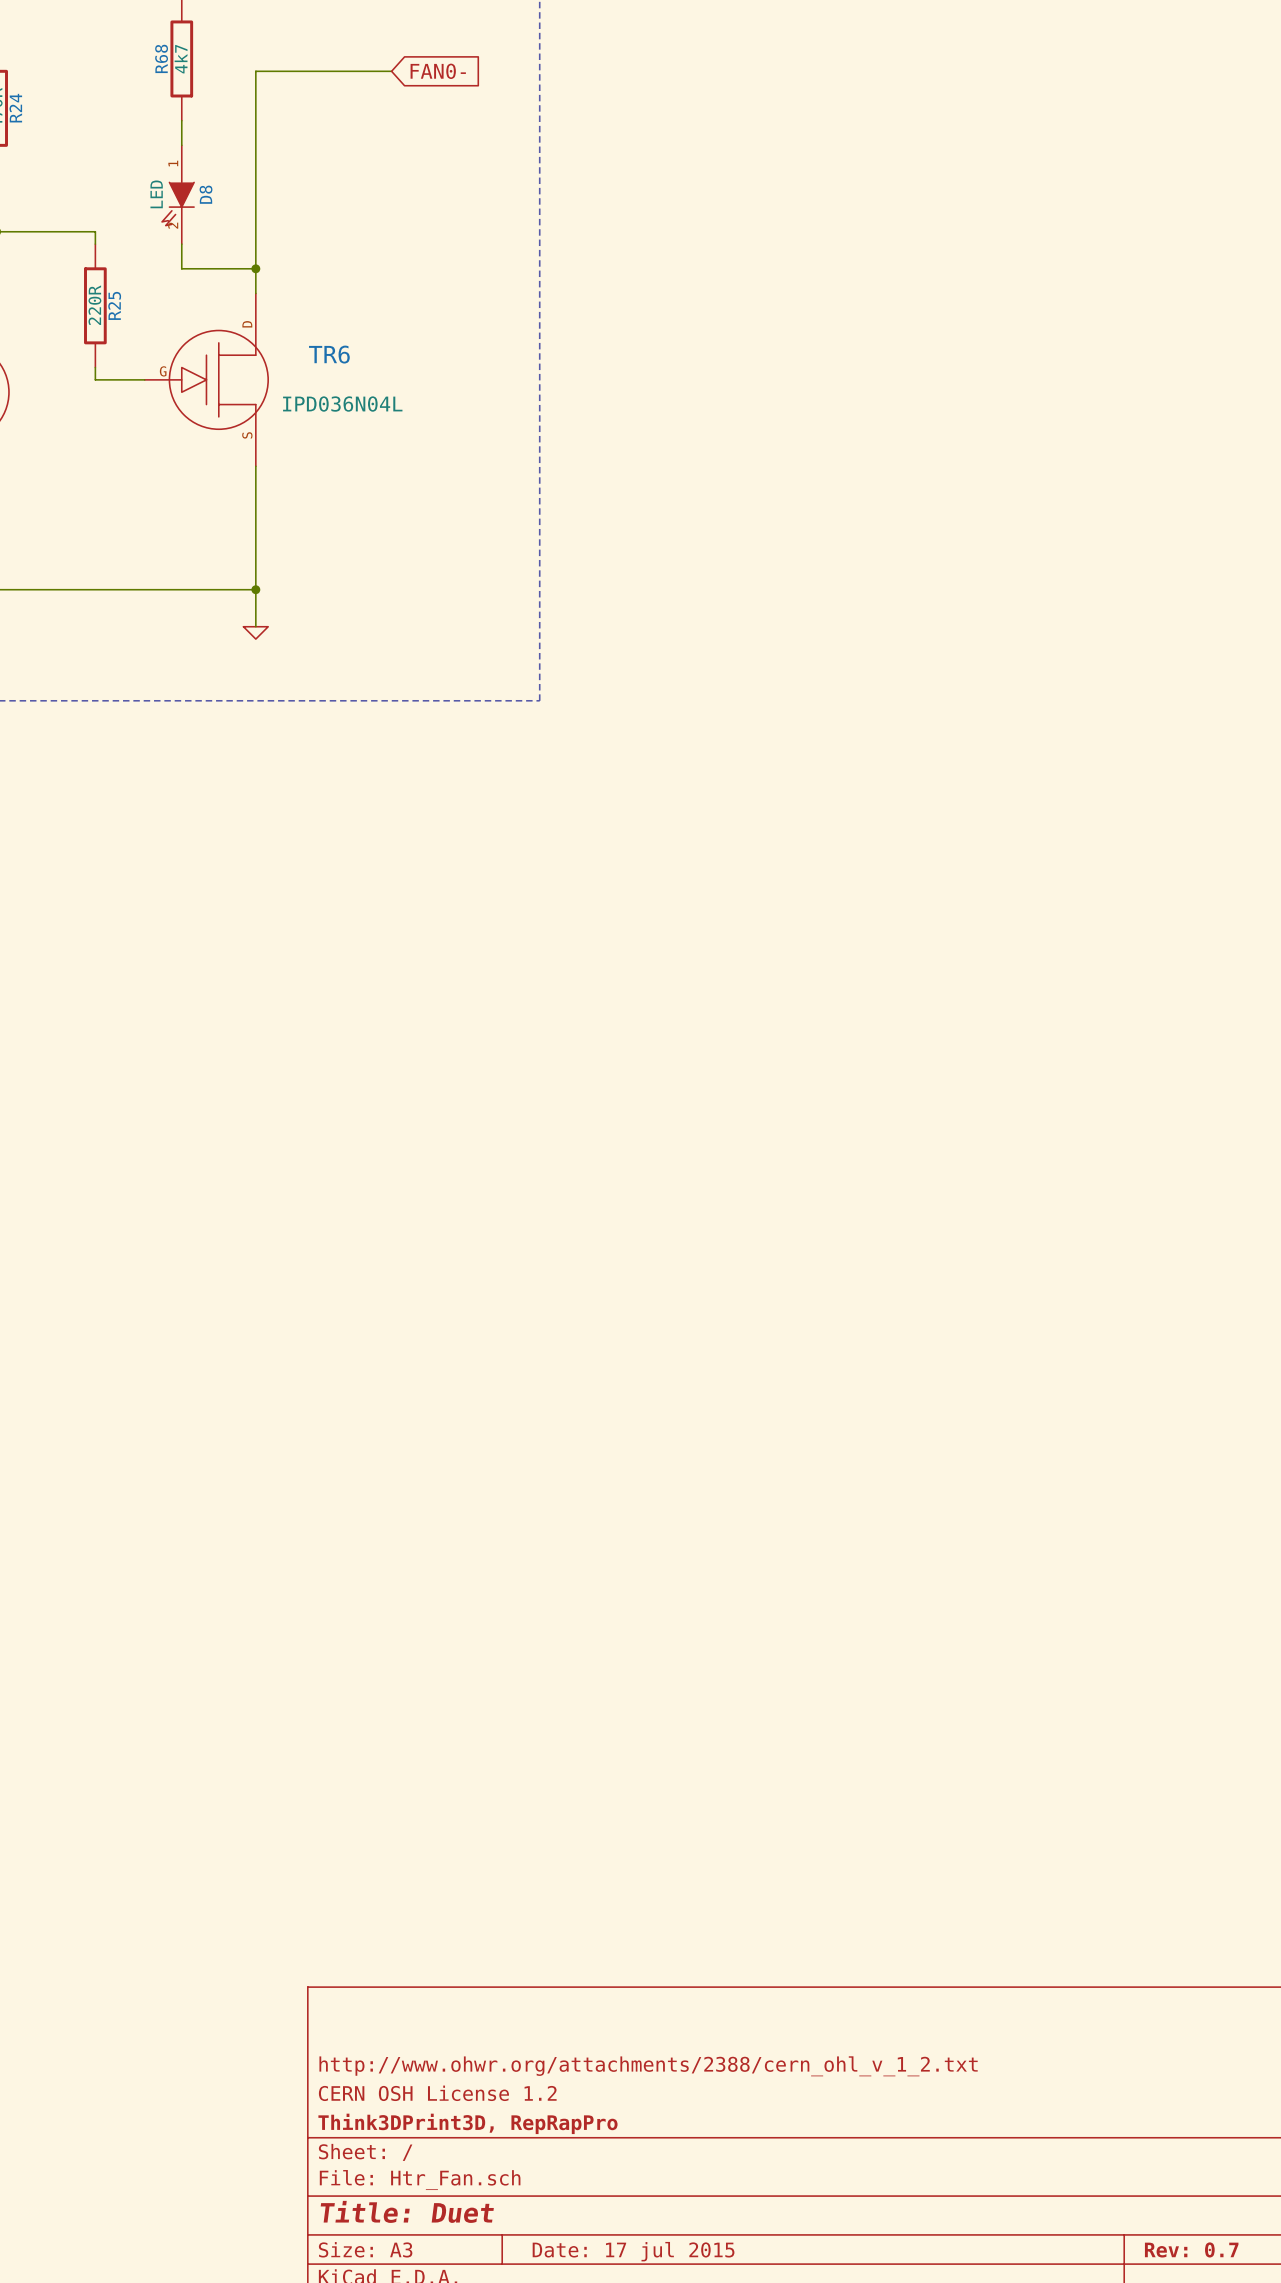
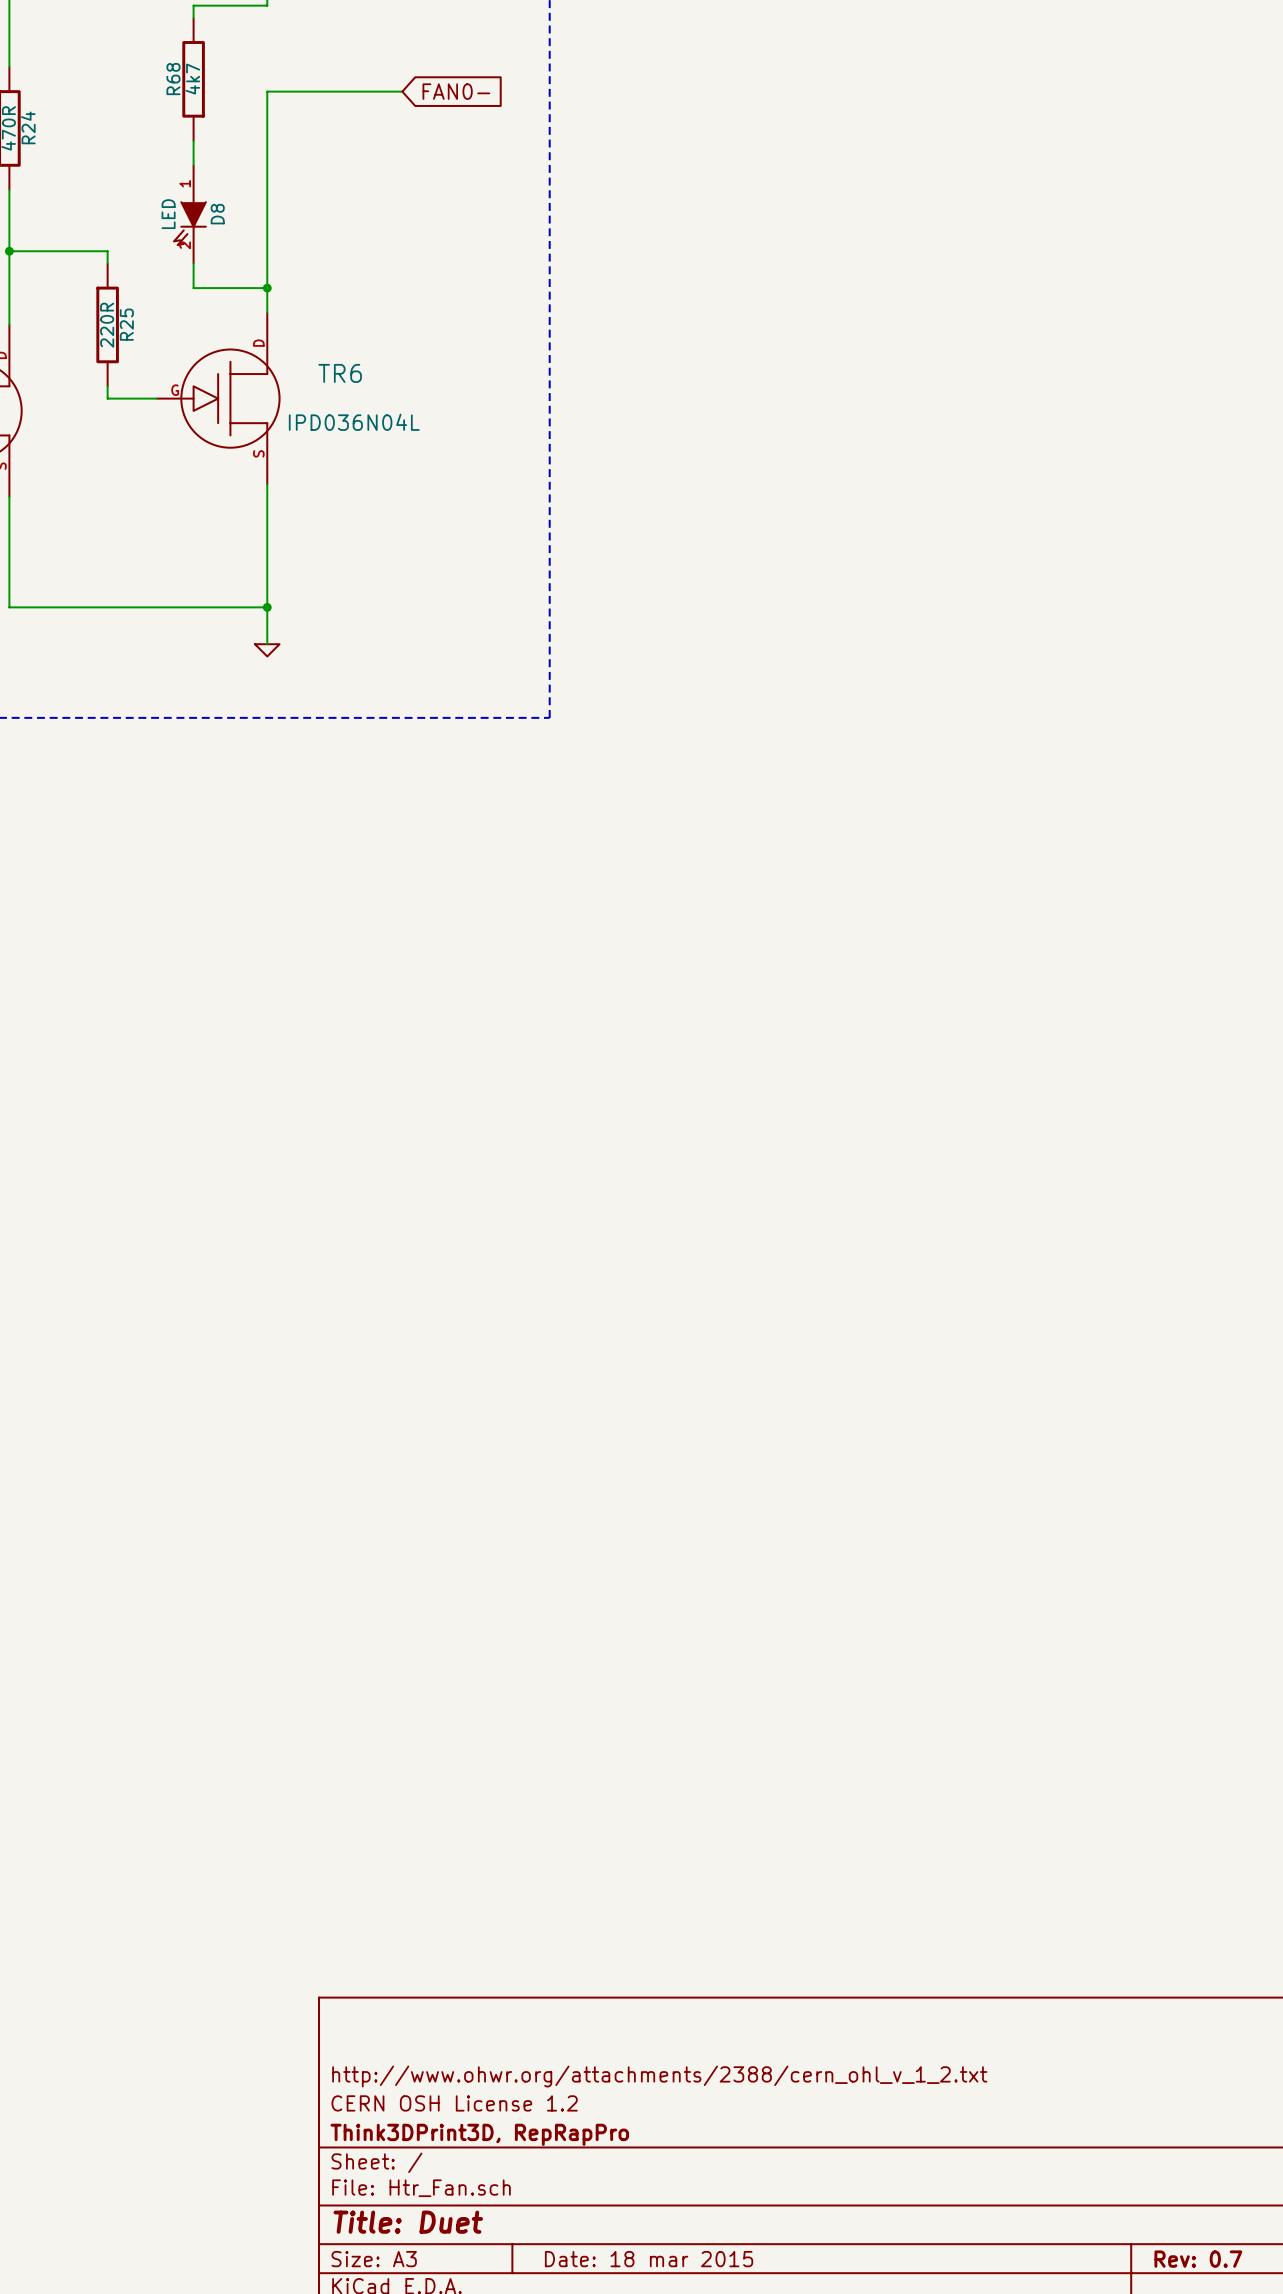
title block: Date: 17 jul 2015 (633, 2251) -> Date: 18 mar 2015 (649, 2259)

